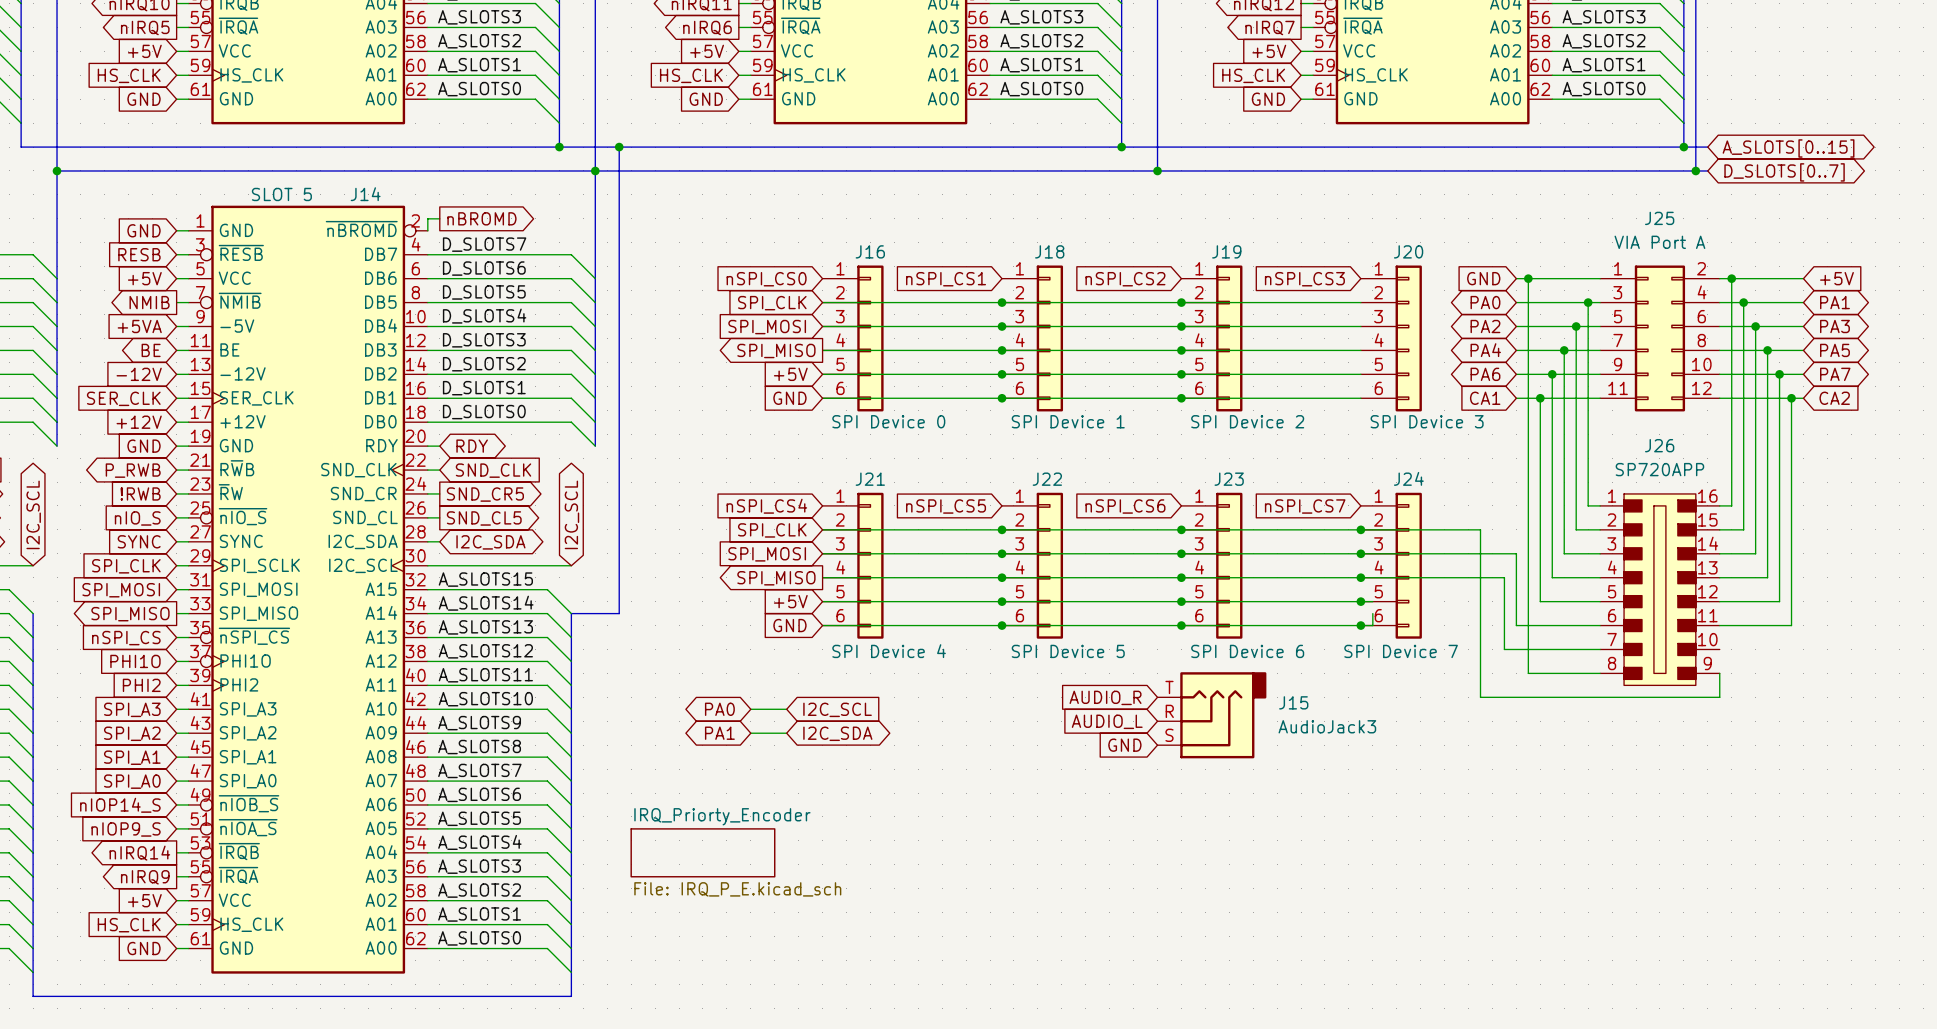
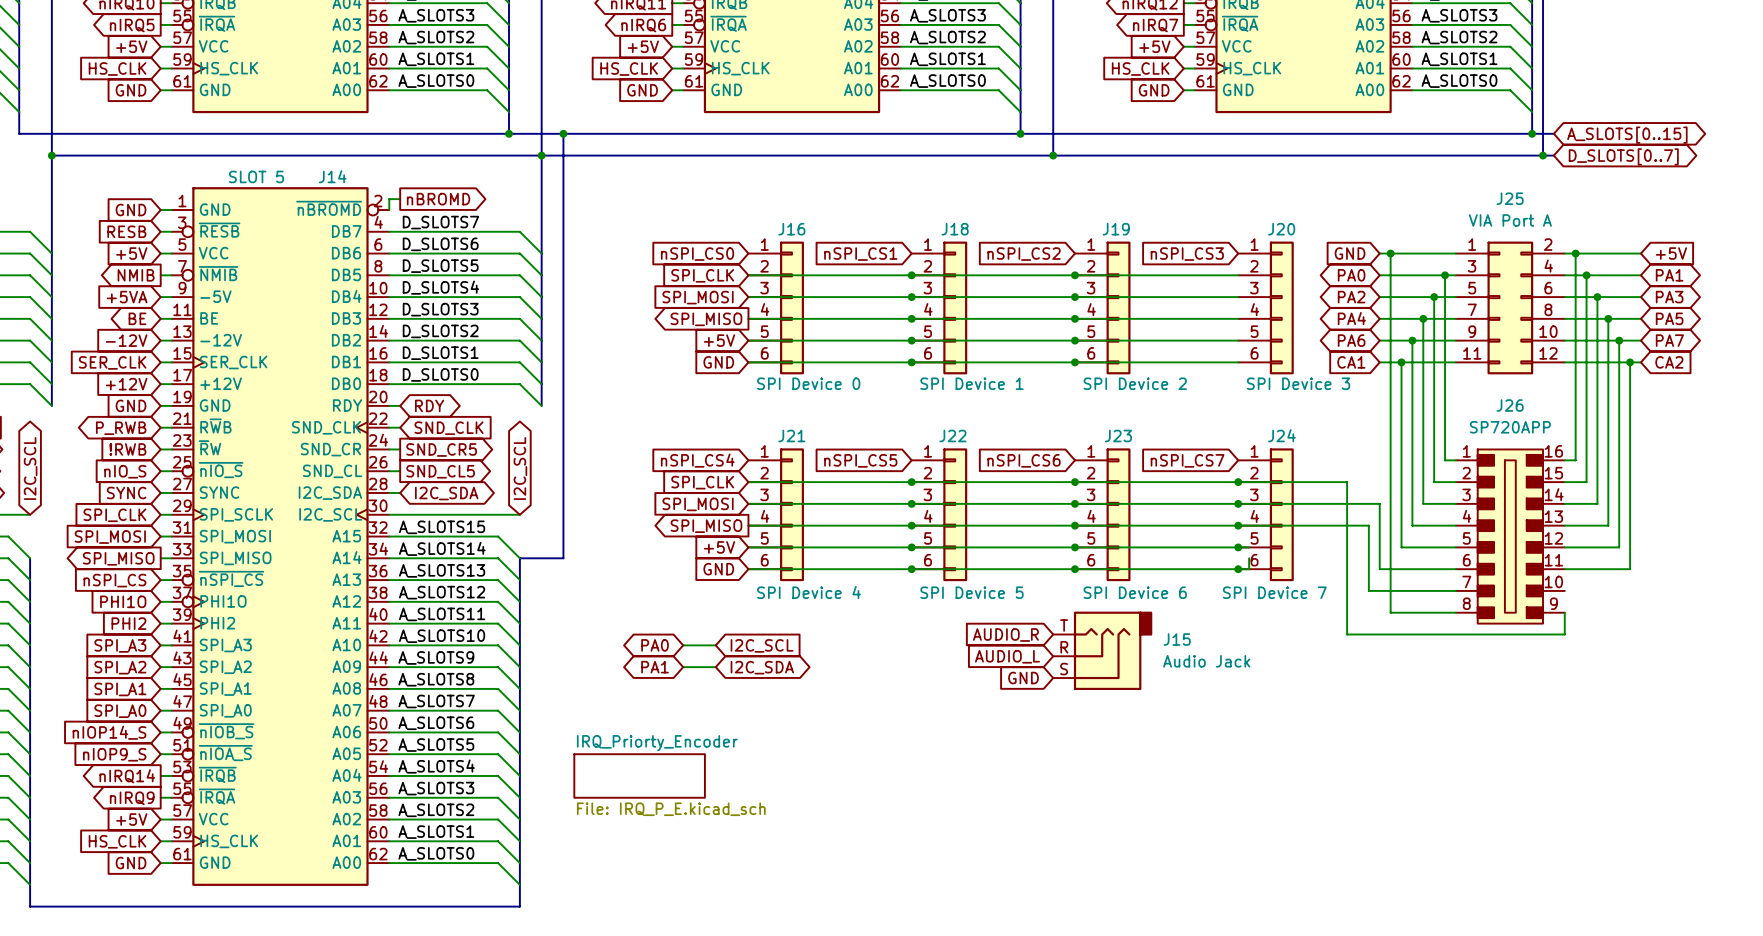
J15 value: AudioJack3 (1327, 726) -> Audio Jack (1206, 661)

